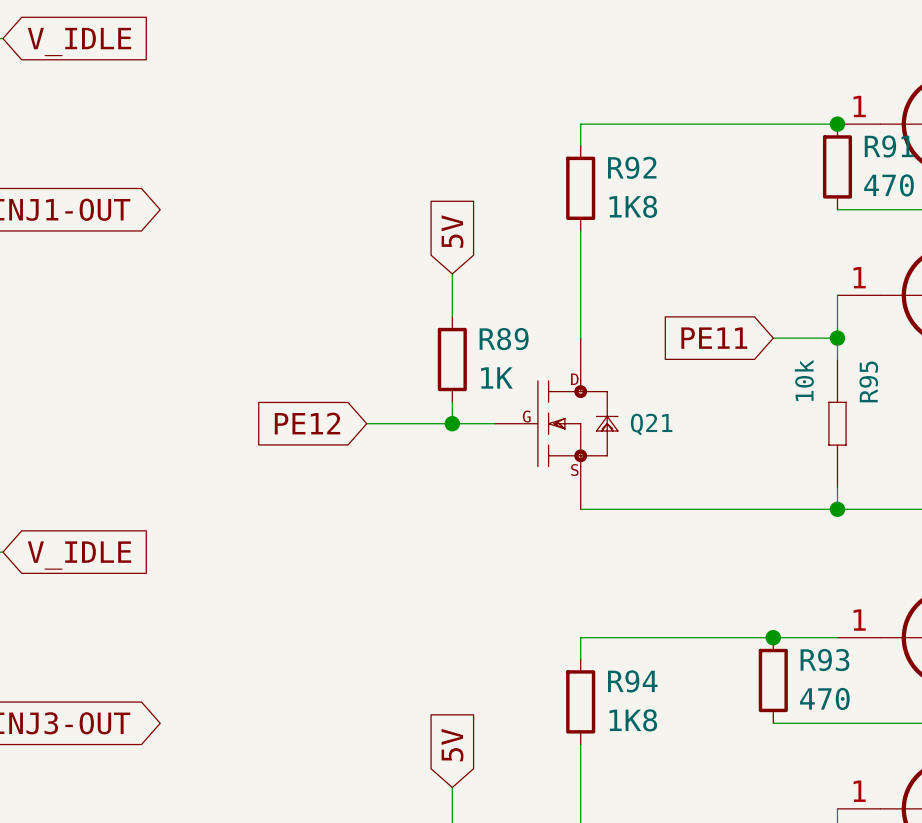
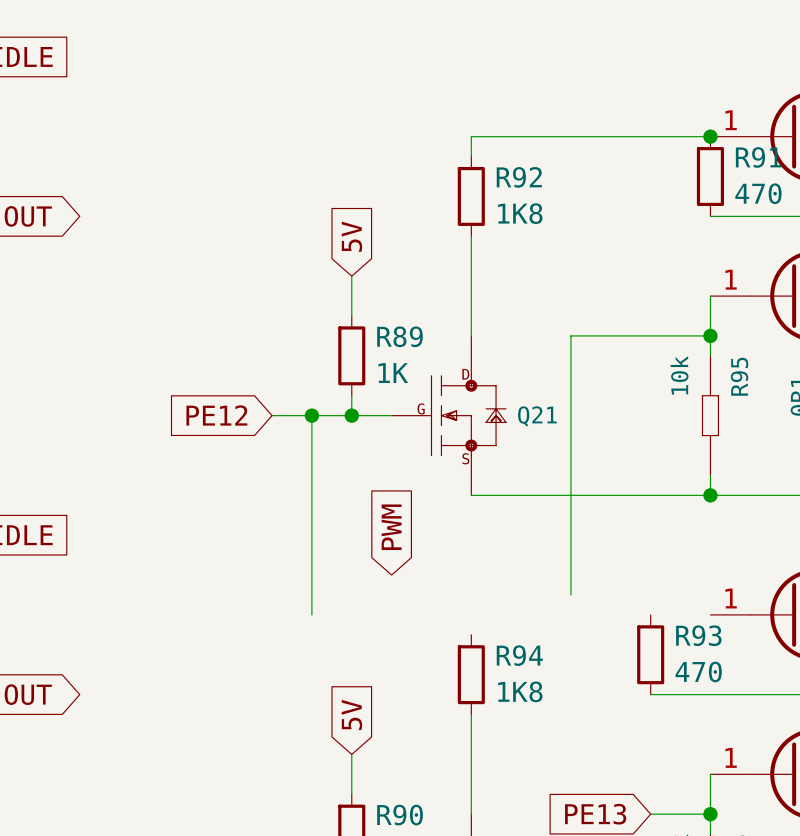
global label: PE11 (714, 338) -> none
wire: none -> (650, 335) (570, 335) (570, 594)
wire: none -> (311, 415) (311, 614)
junction: none -> (311, 415)
global label: none -> PWM (391, 527)
junction: (773, 637) -> none
wire: (837, 637) (580, 637) (580, 659) -> none

